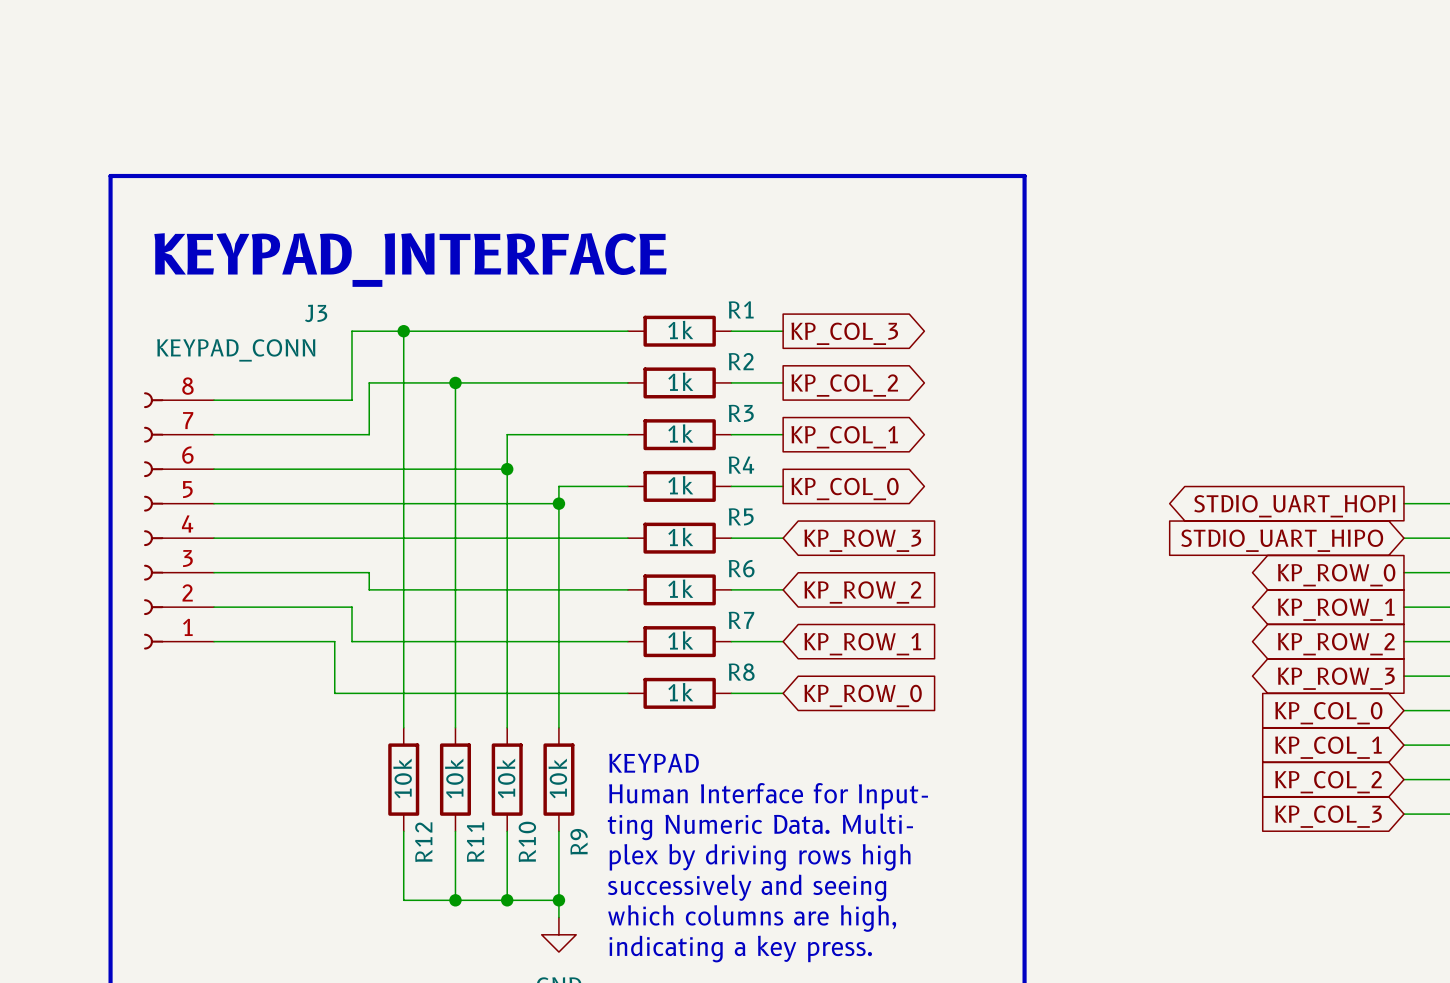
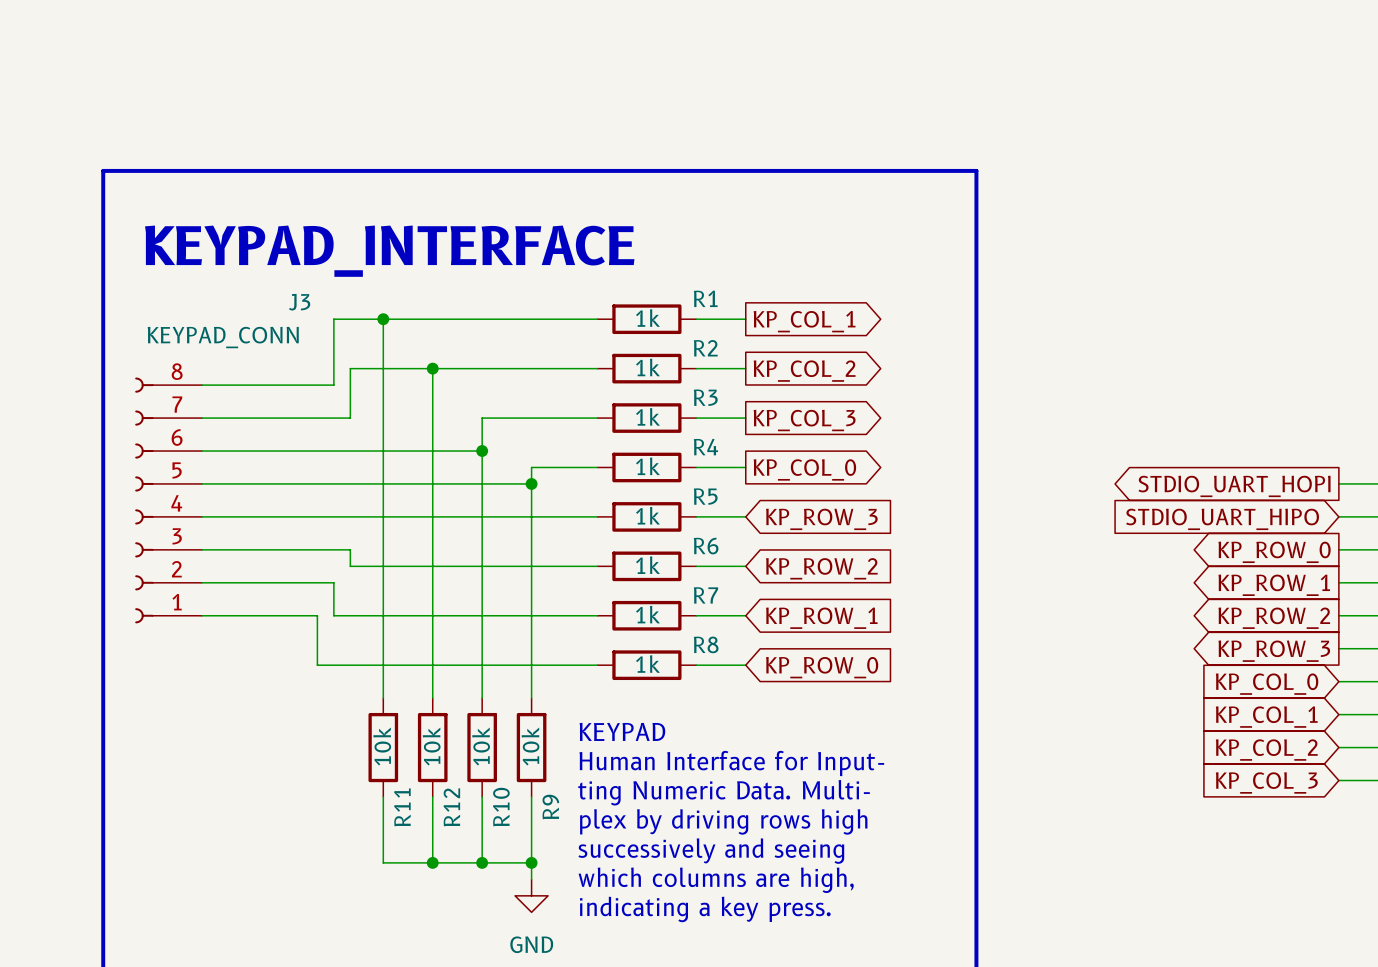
global label: KP_COL_3 (844, 333) -> KP_COL_1 (804, 321)
global label: KP_COL_1 (844, 437) -> KP_COL_3 (804, 420)
R12 name: R12 (423, 842) -> R11 (402, 807)
R11 name: R11 (475, 842) -> R12 (451, 807)

